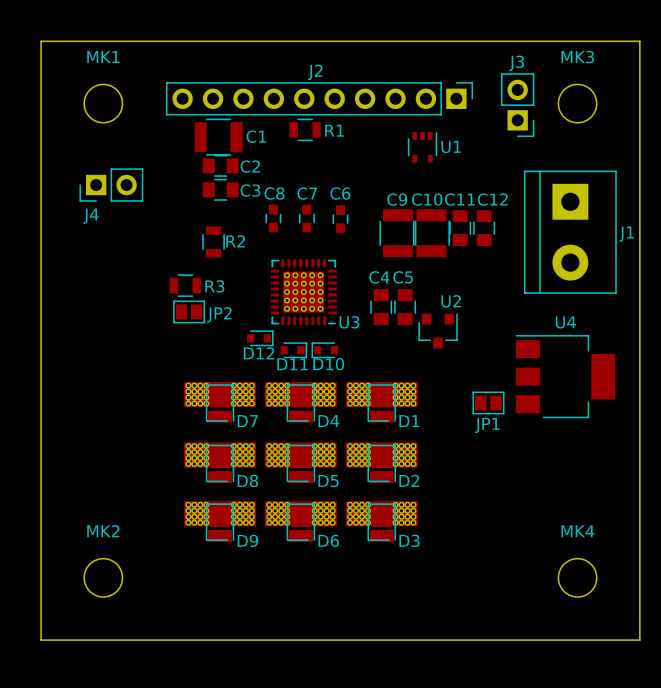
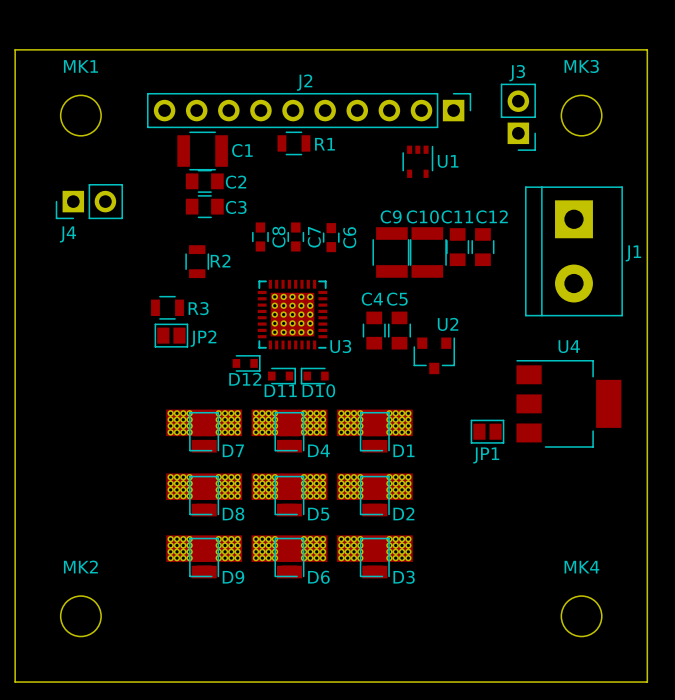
C8 name rotation: 0° (274, 193) -> 90° counterclockwise (278, 237)
C7 name rotation: 0° (307, 193) -> 90° counterclockwise (314, 237)
C7 name position: C7 (307, 193) -> C7 (314, 237)
C6 name rotation: 0° (340, 193) -> 90° counterclockwise (349, 237)
C6 name position: C6 (340, 193) -> C6 (349, 237)

